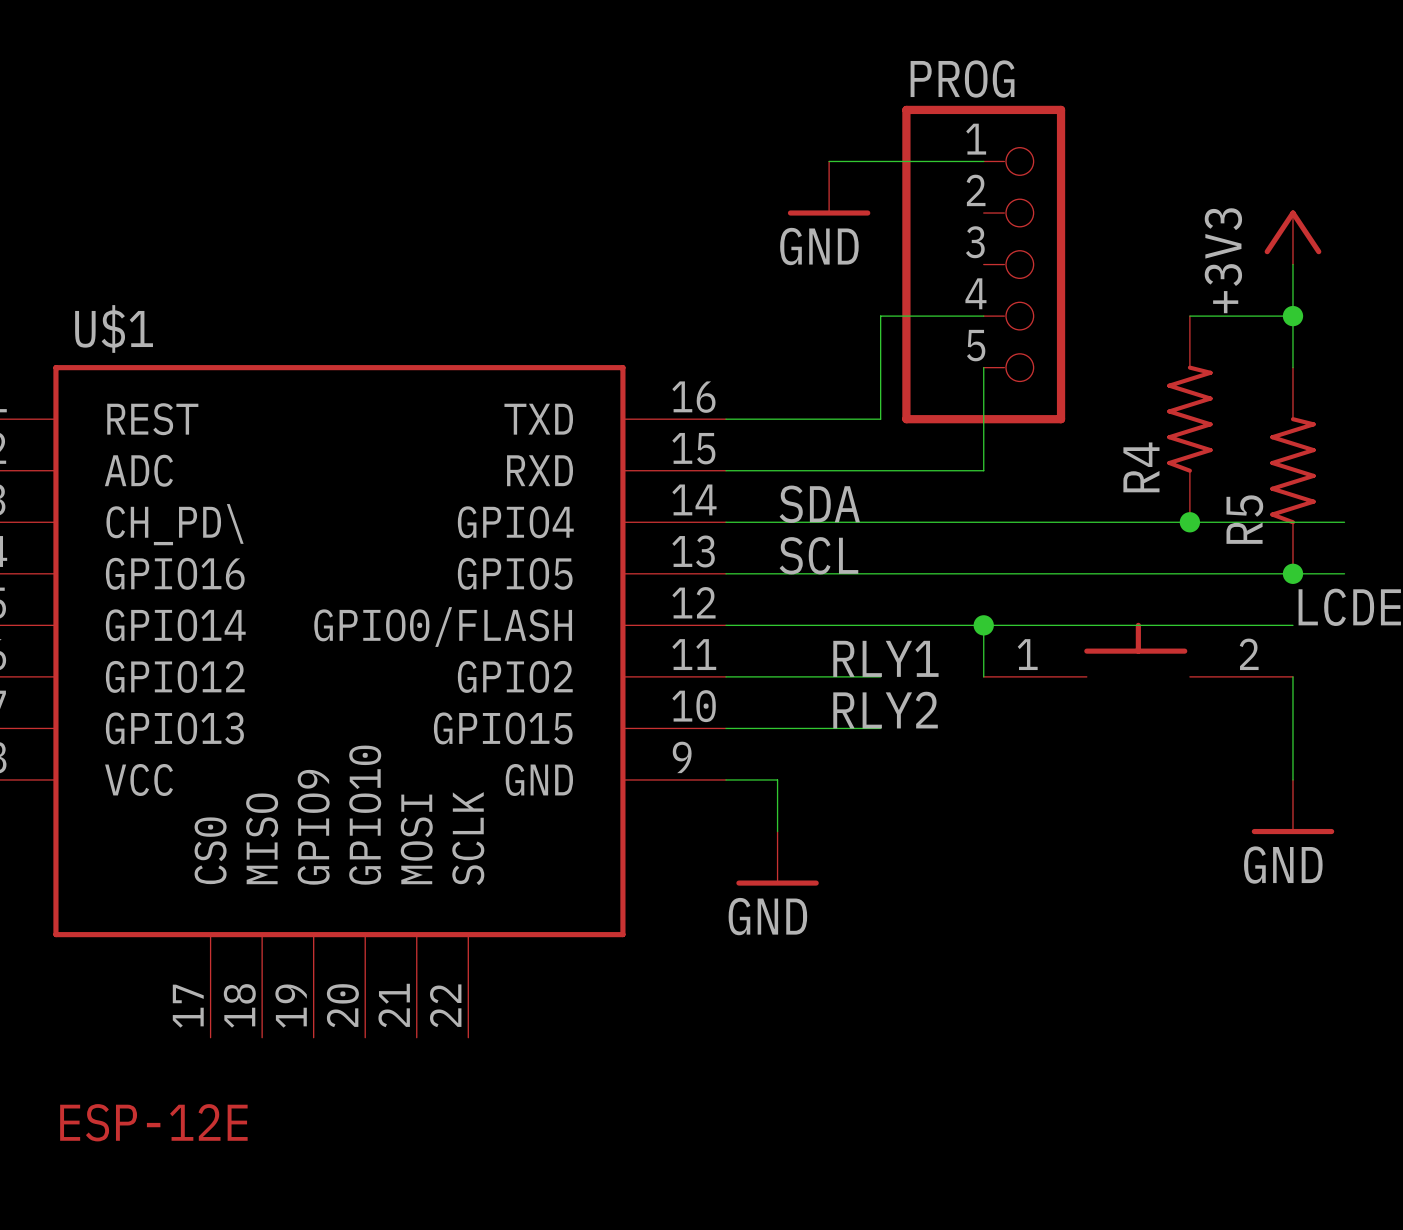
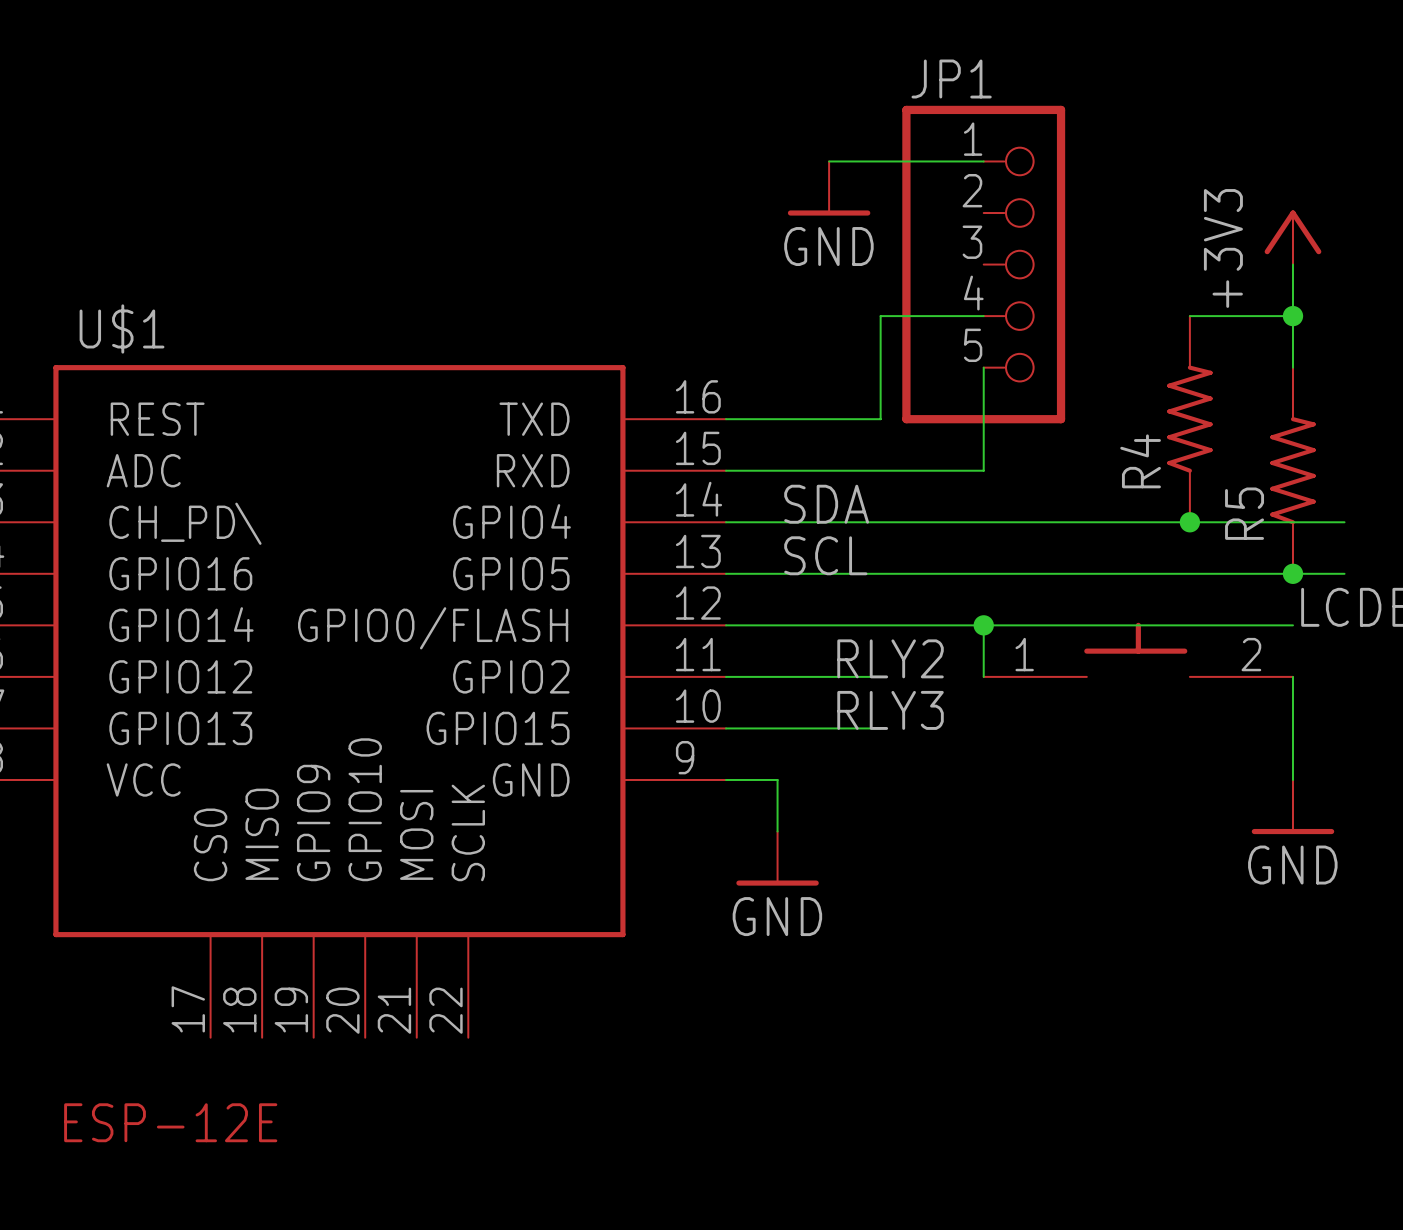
PROG name: PROG (962, 79) -> JP1 (951, 79)
label: RLY1 (885, 658) -> RLY2 (890, 658)
label: RLY2 (885, 710) -> RLY3 (890, 710)

